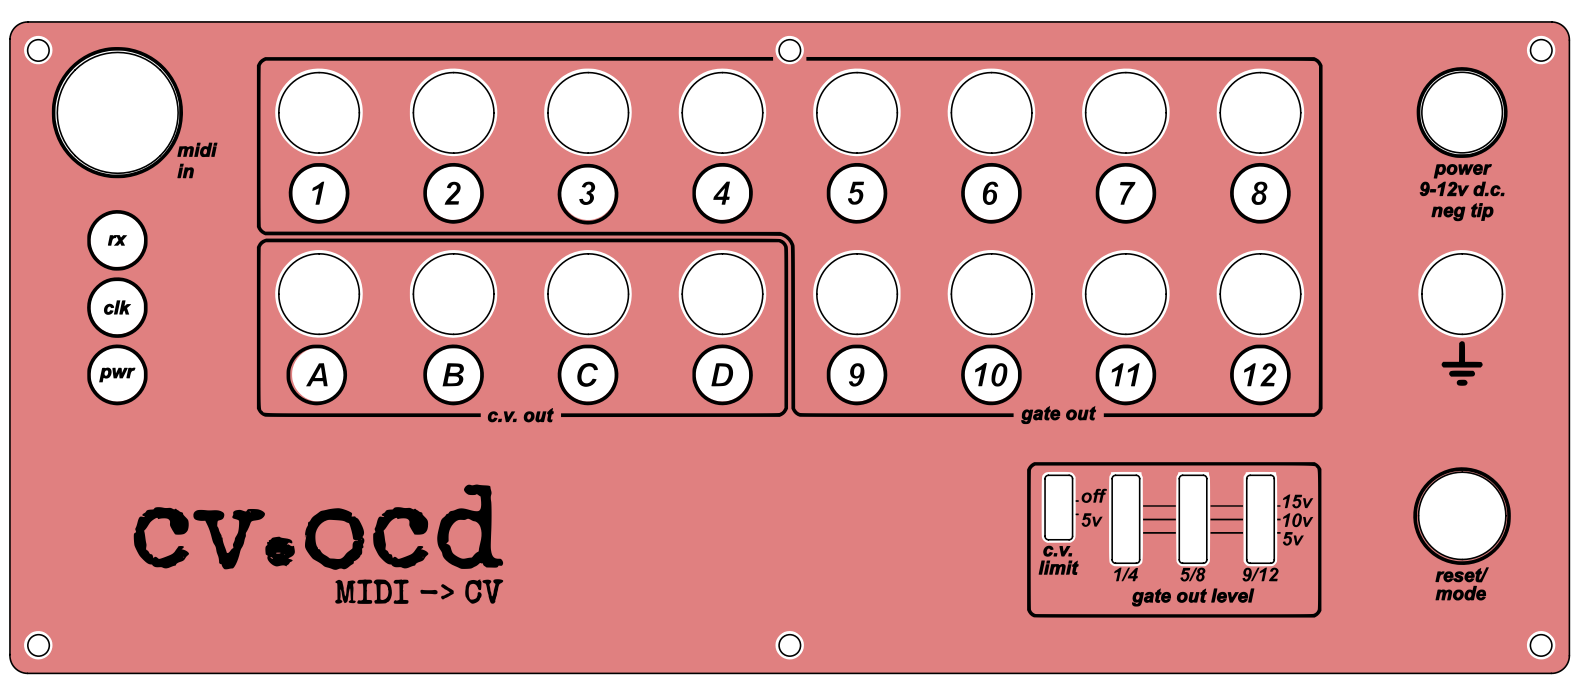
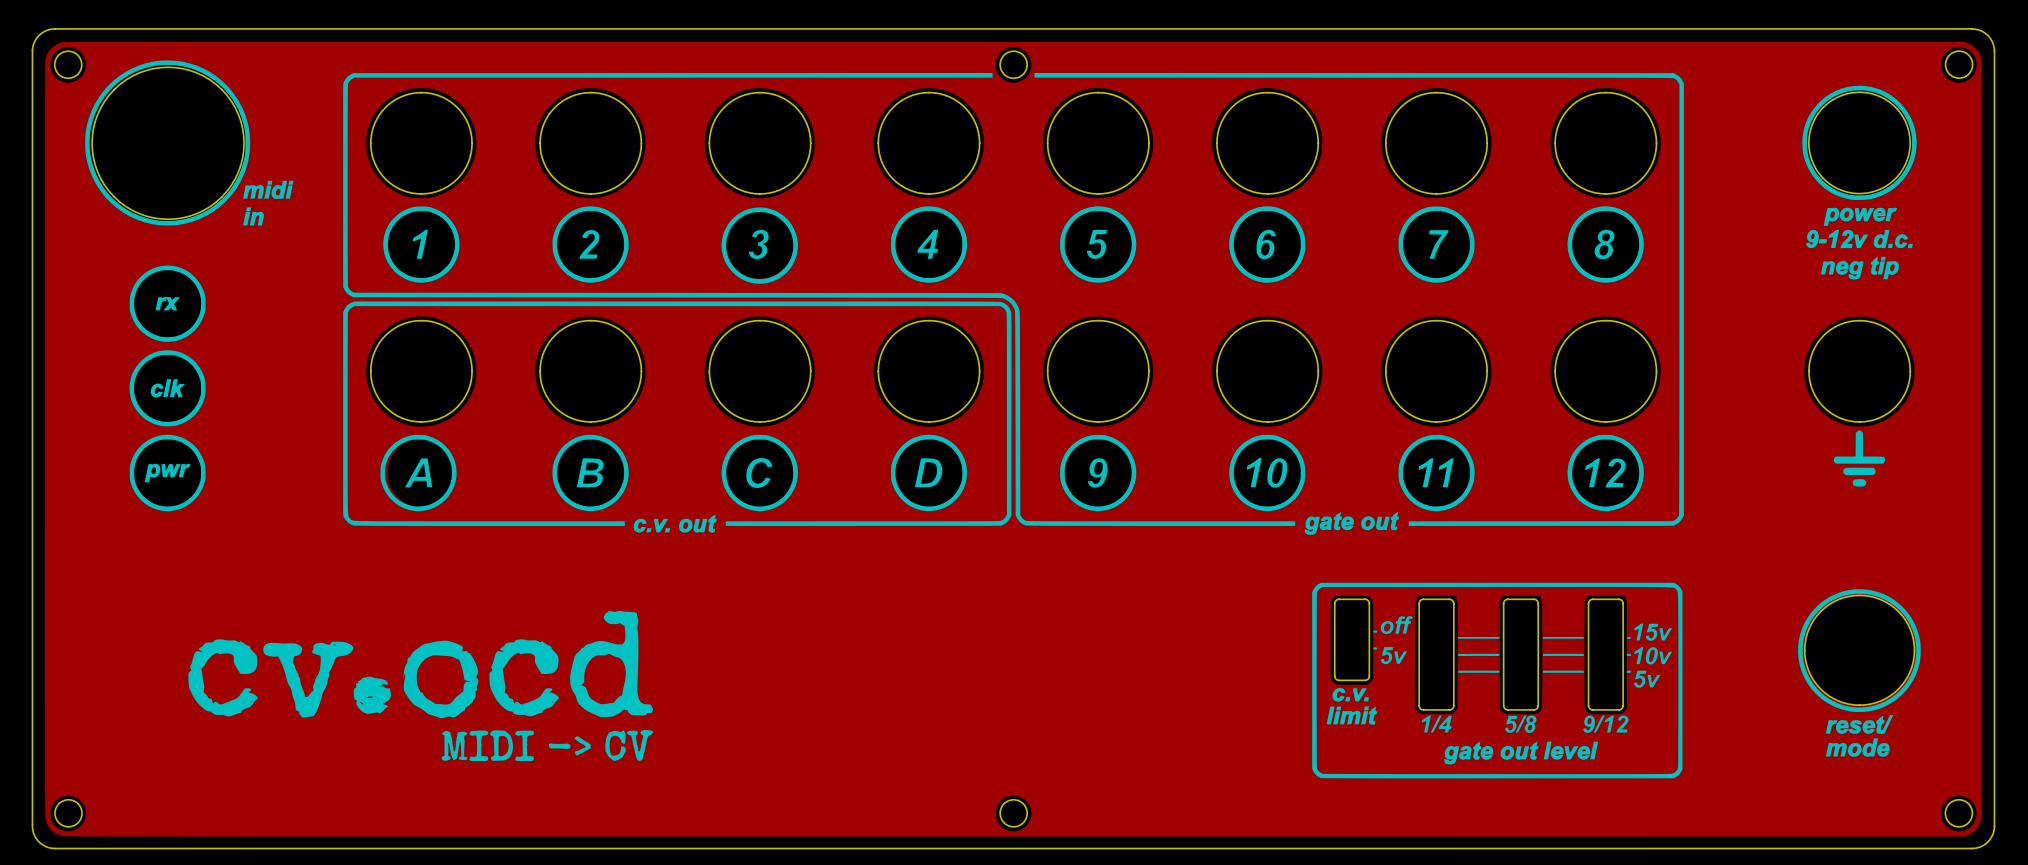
drawing shape: [9, 21, 1570, 674] -> [45, 41, 1982, 837]

